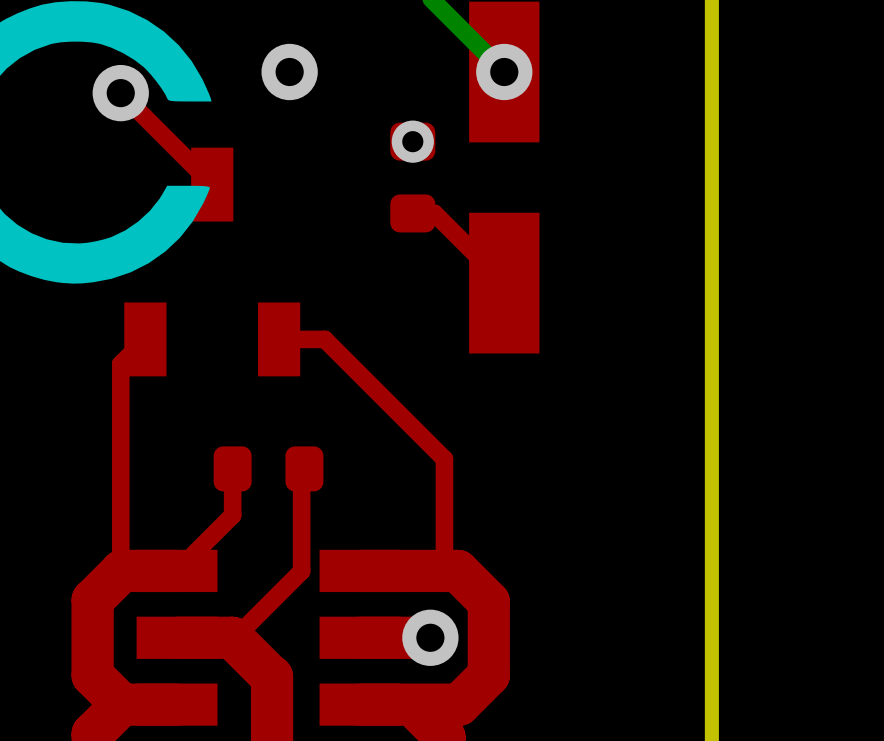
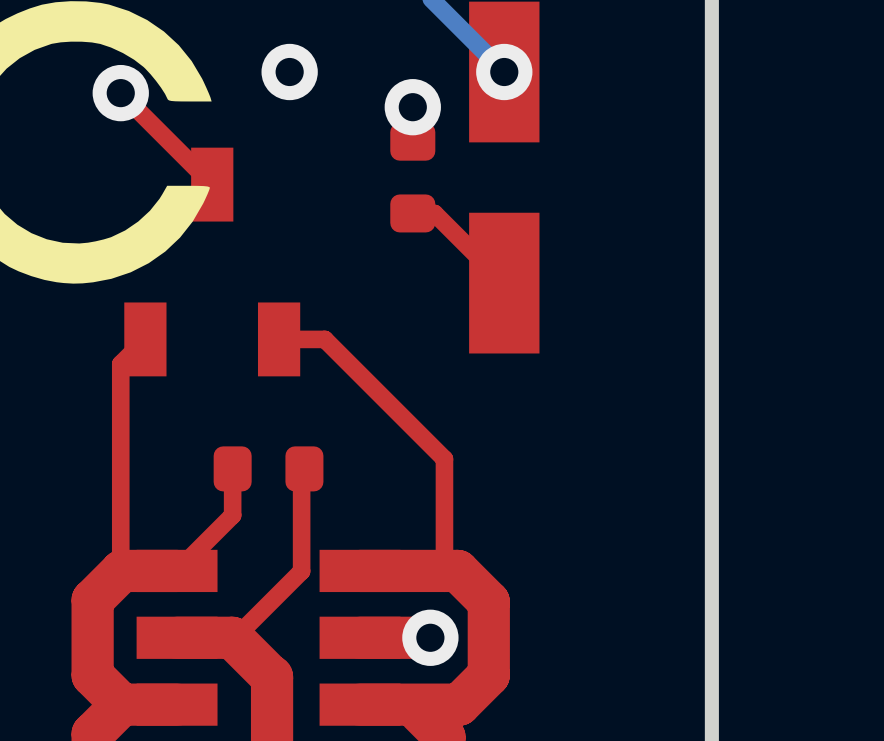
via position: (412, 141) -> (412, 107)

